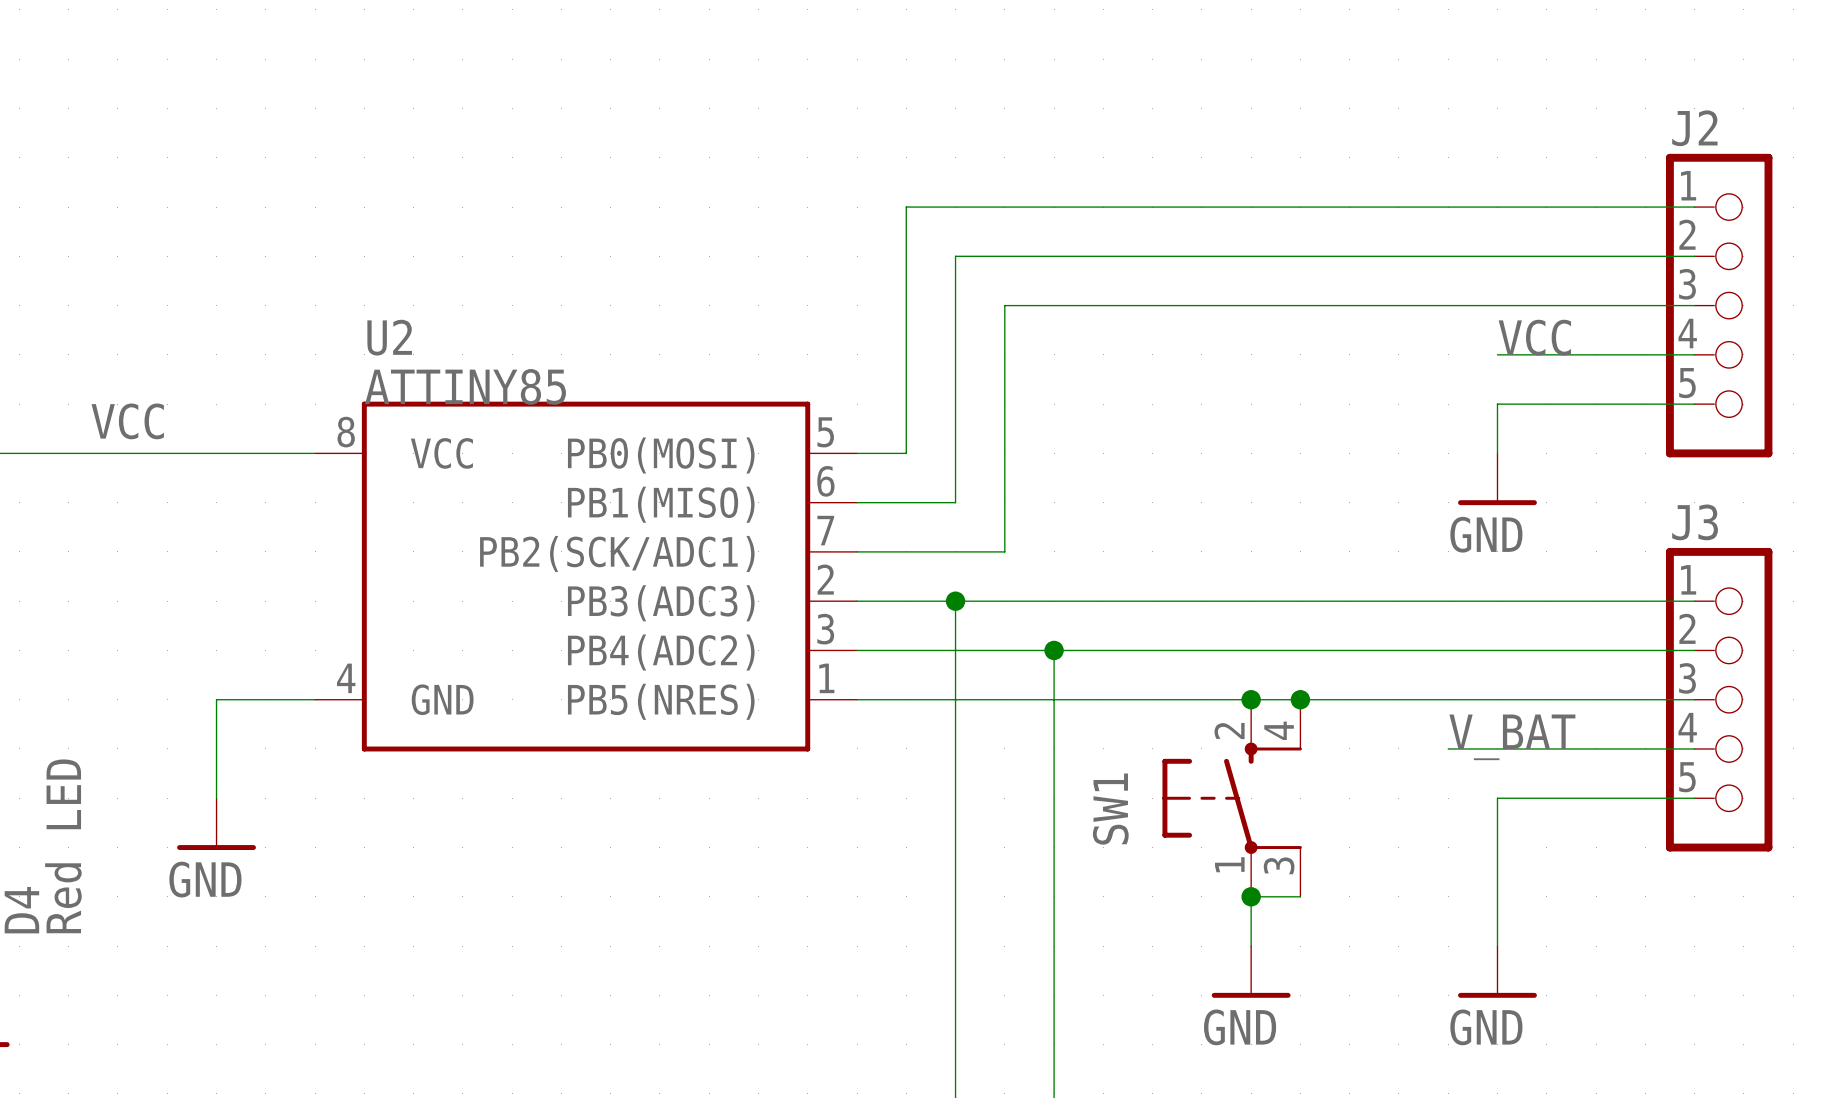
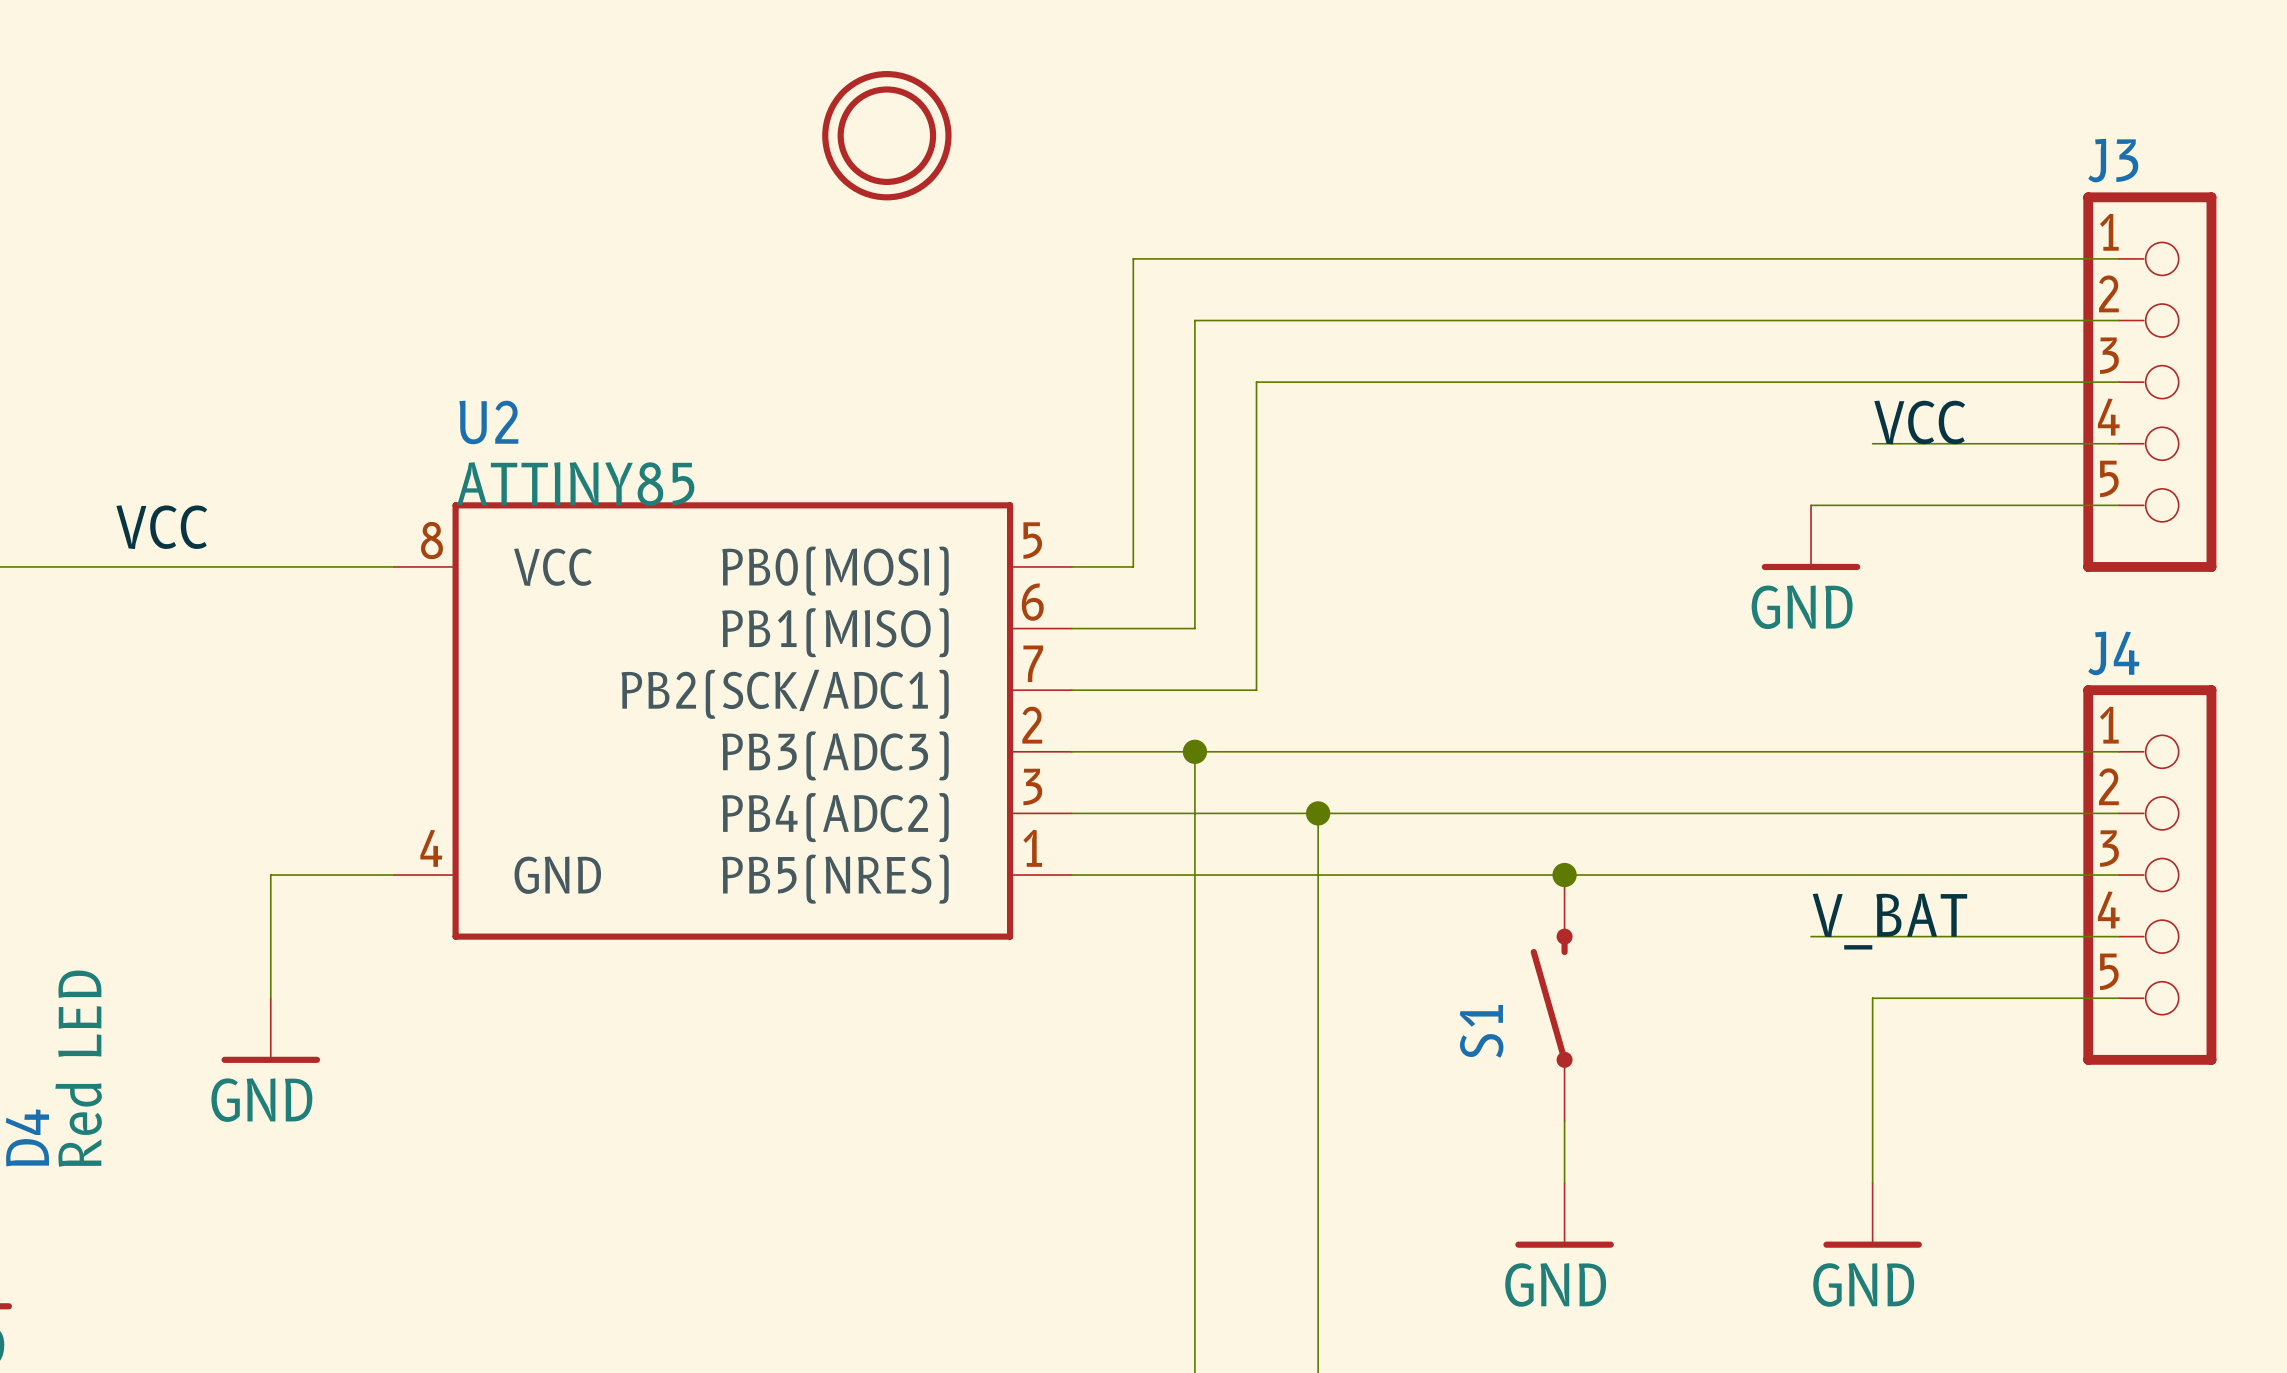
part: none -> (886, 135)
J2 name: J2 (1694, 128) -> J3 (2113, 160)
wire: (1497, 404) (1497, 453) -> (1872, 505) (1811, 505)
power symbol position: GND (1497, 479) -> GND (1811, 537)
J3 name: J3 (1695, 522) -> J4 (2113, 653)
junction: (1300, 699) -> none
SW1: (1232, 798) -> none
S1: none -> (1551, 998)
wire: (1251, 896) (1300, 896) -> none
junction: (1251, 896) -> none

